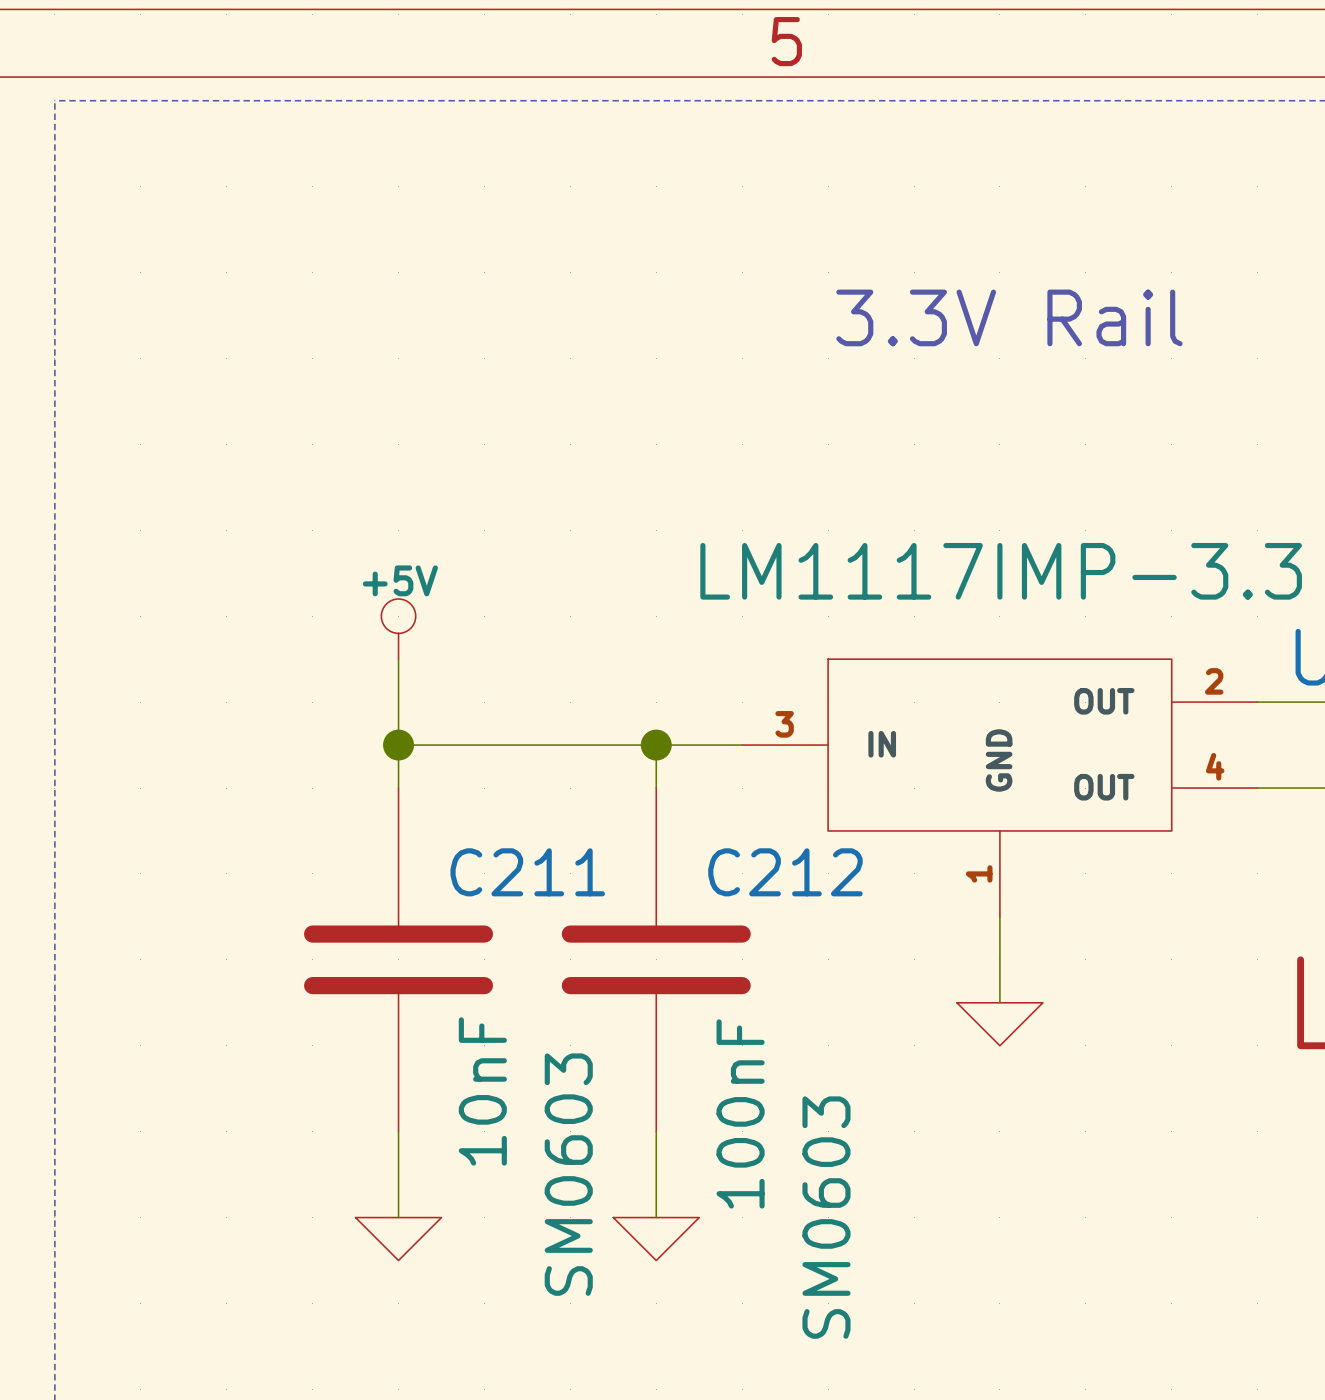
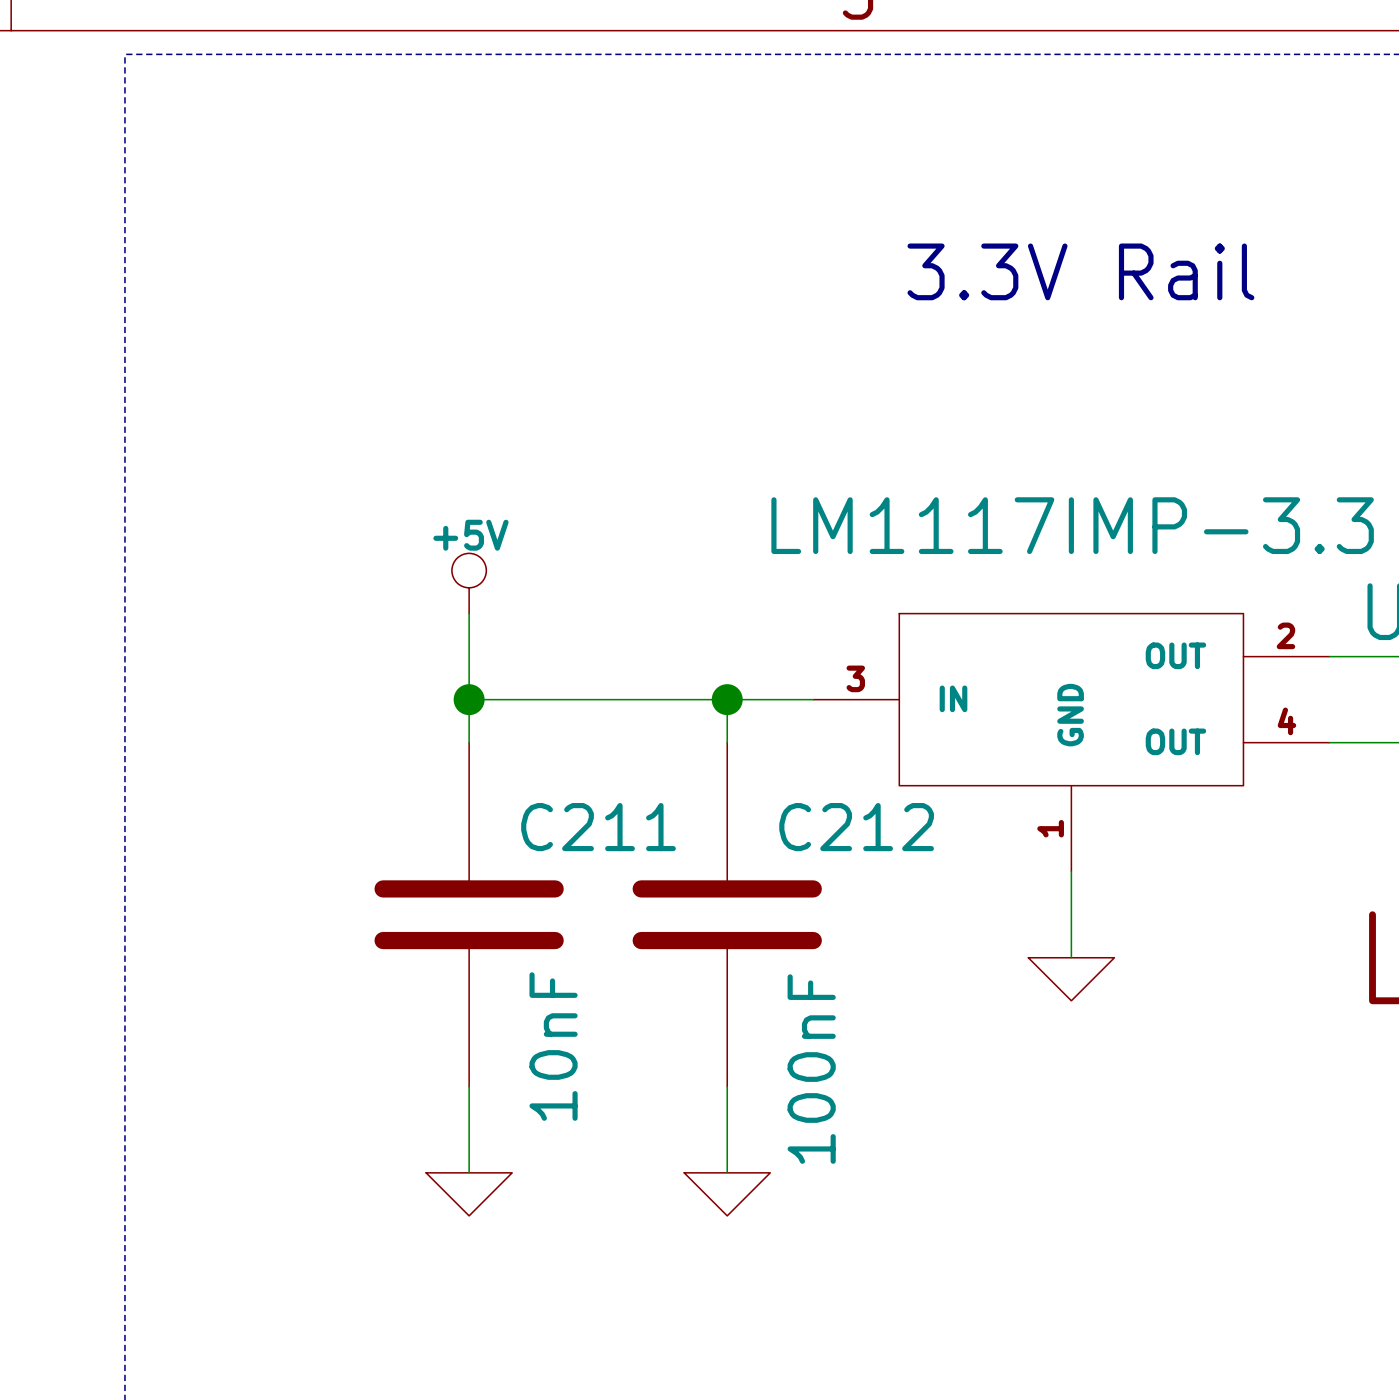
C211 text: SM0603 (568, 1174) -> none
C212 text: SM0603 (826, 1217) -> none

